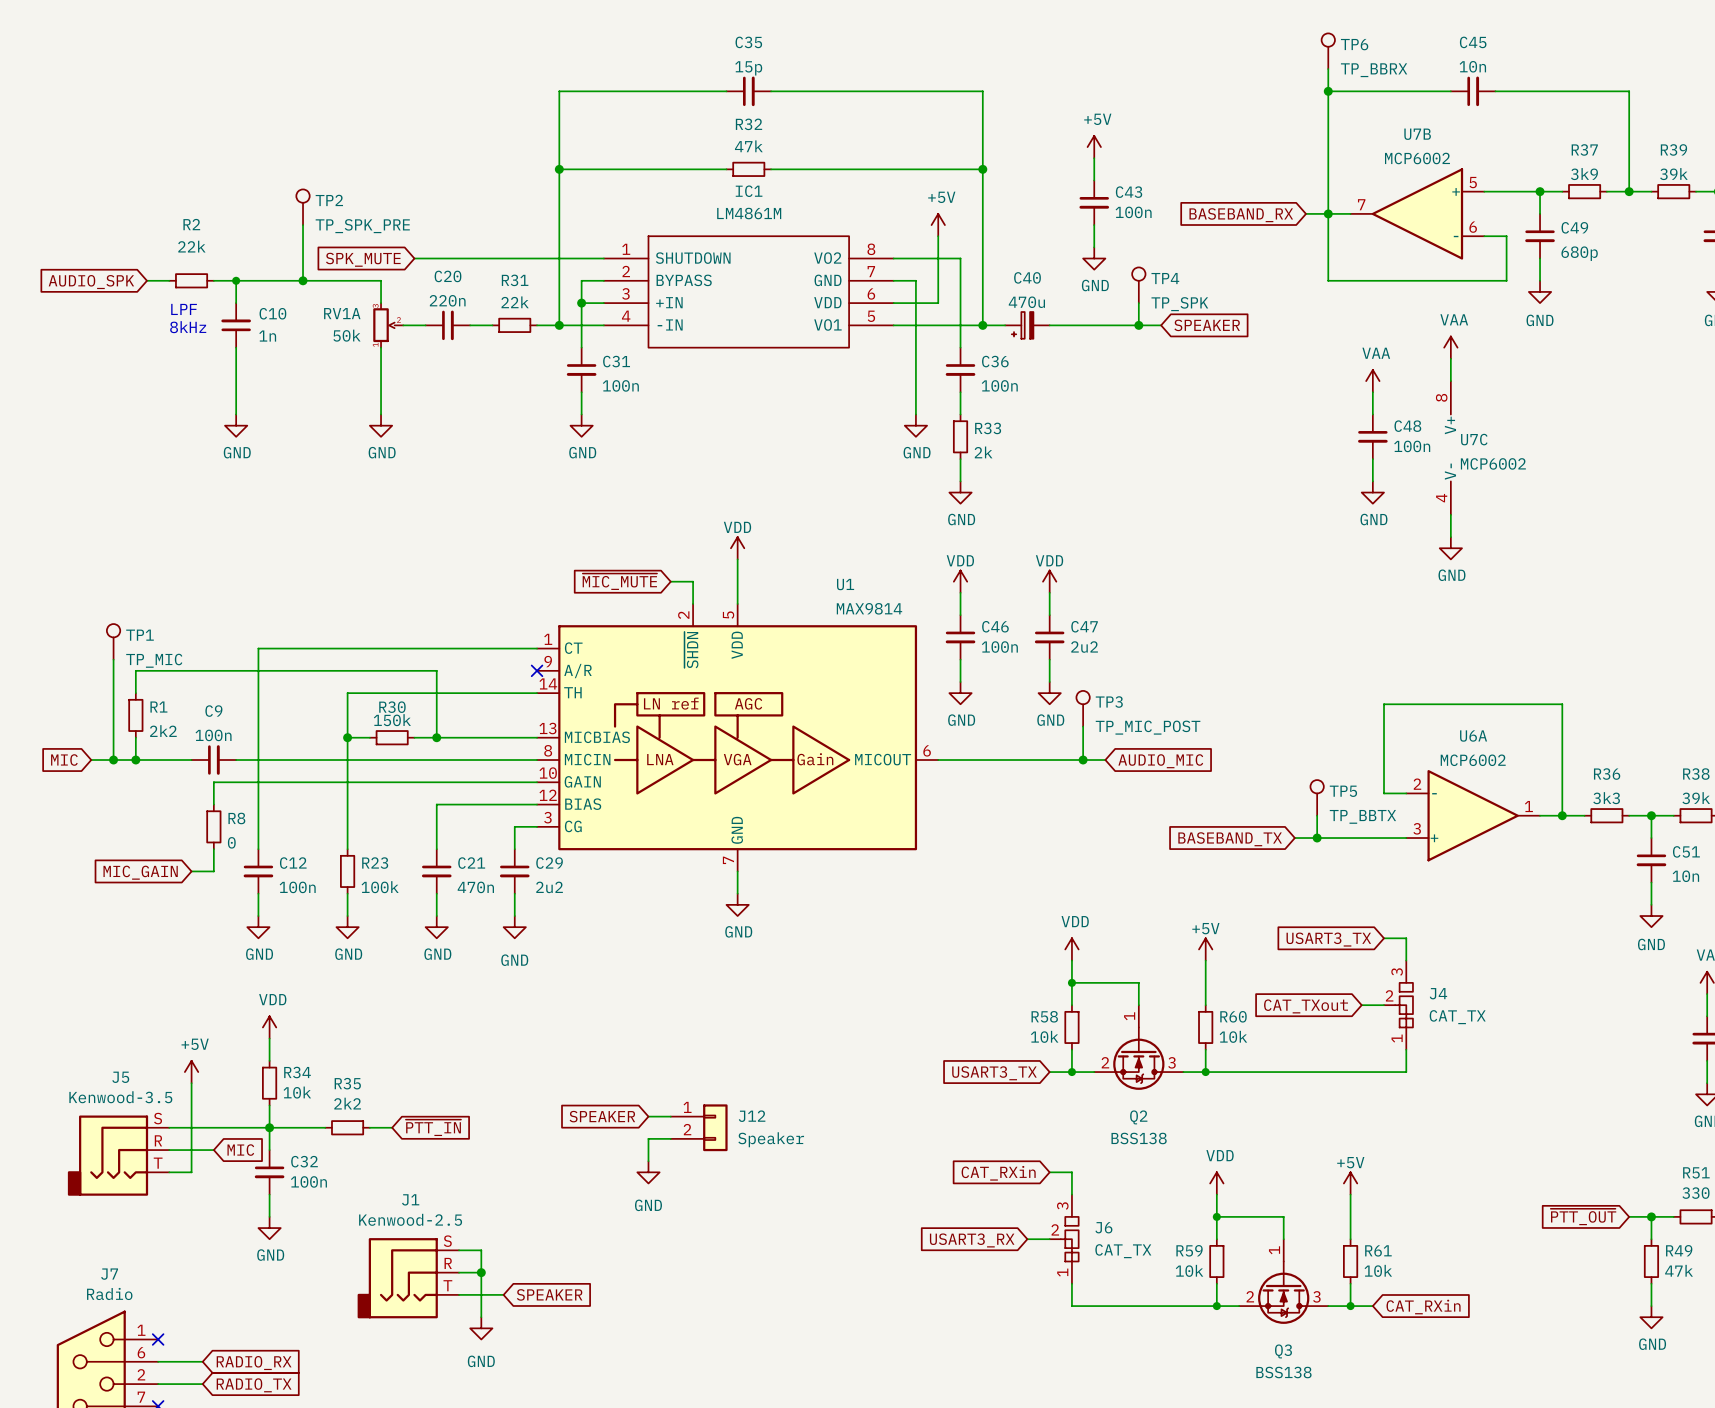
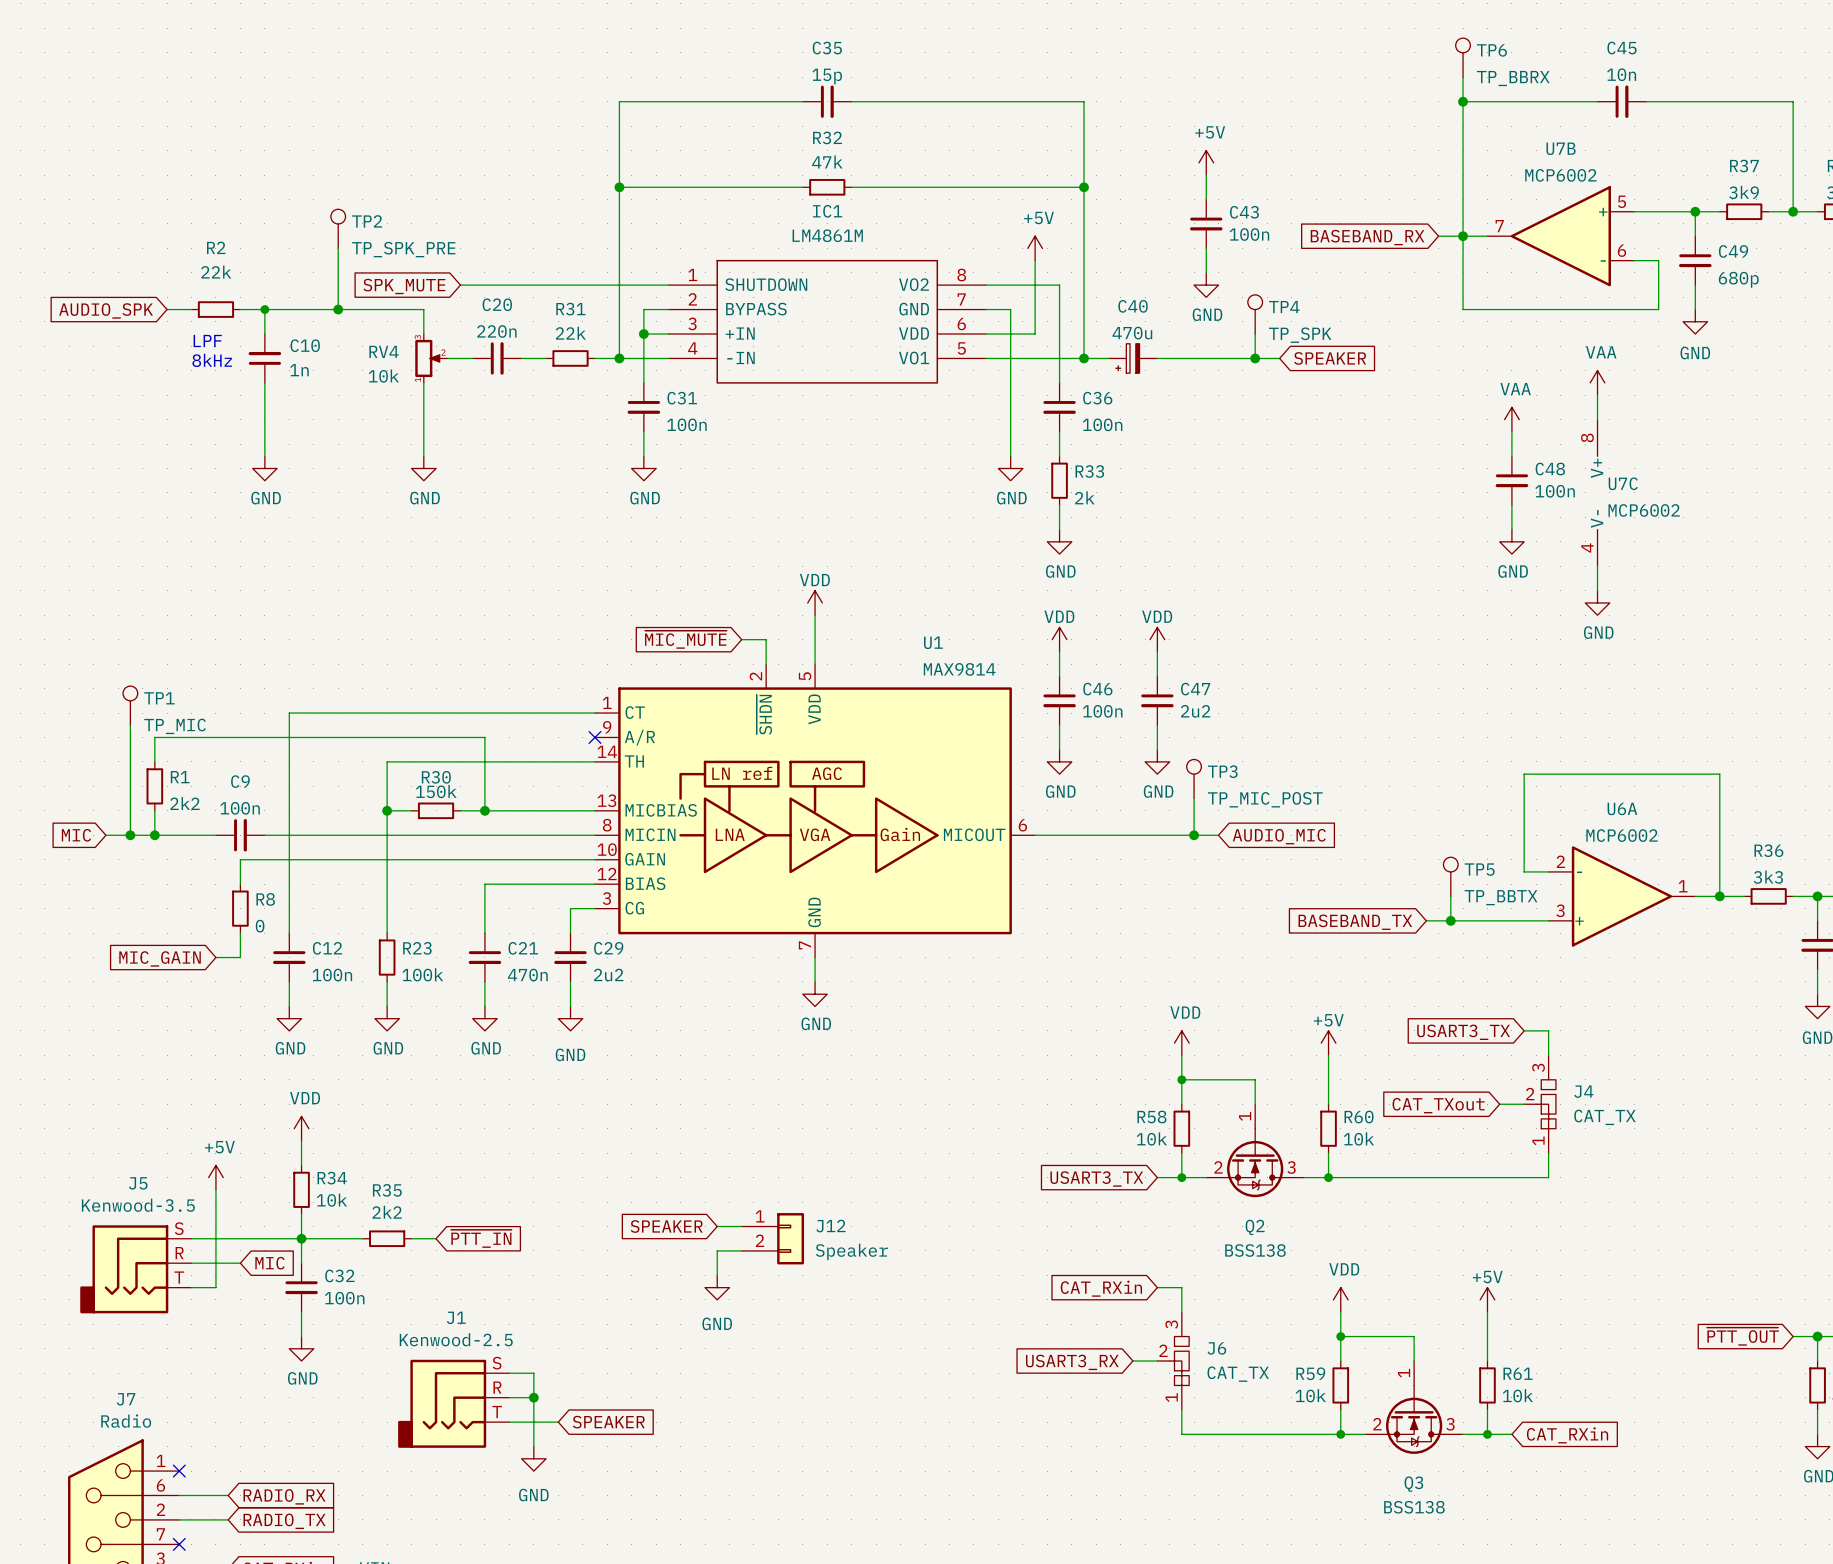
RV1A: 50k (388, 325) -> none
RV4: none -> 10k (431, 358)

